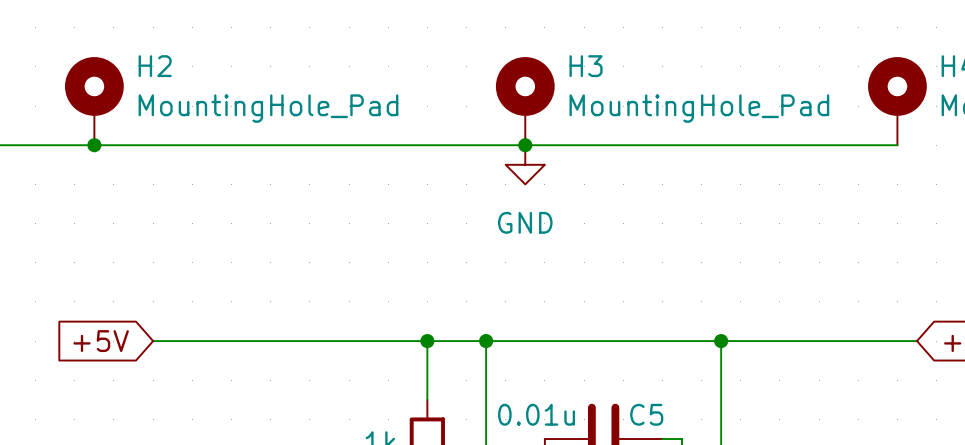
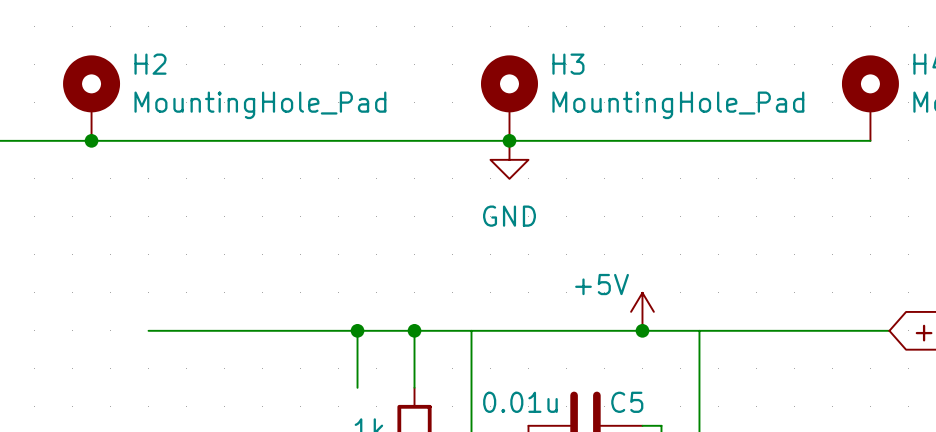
power symbol: none -> +5V (642, 311)
global label: +5V (101, 341) -> none
wire: none -> (357, 330) (357, 387)
junction: none -> (357, 330)
junction: (486, 341) -> none
junction position: (721, 341) -> (642, 330)

